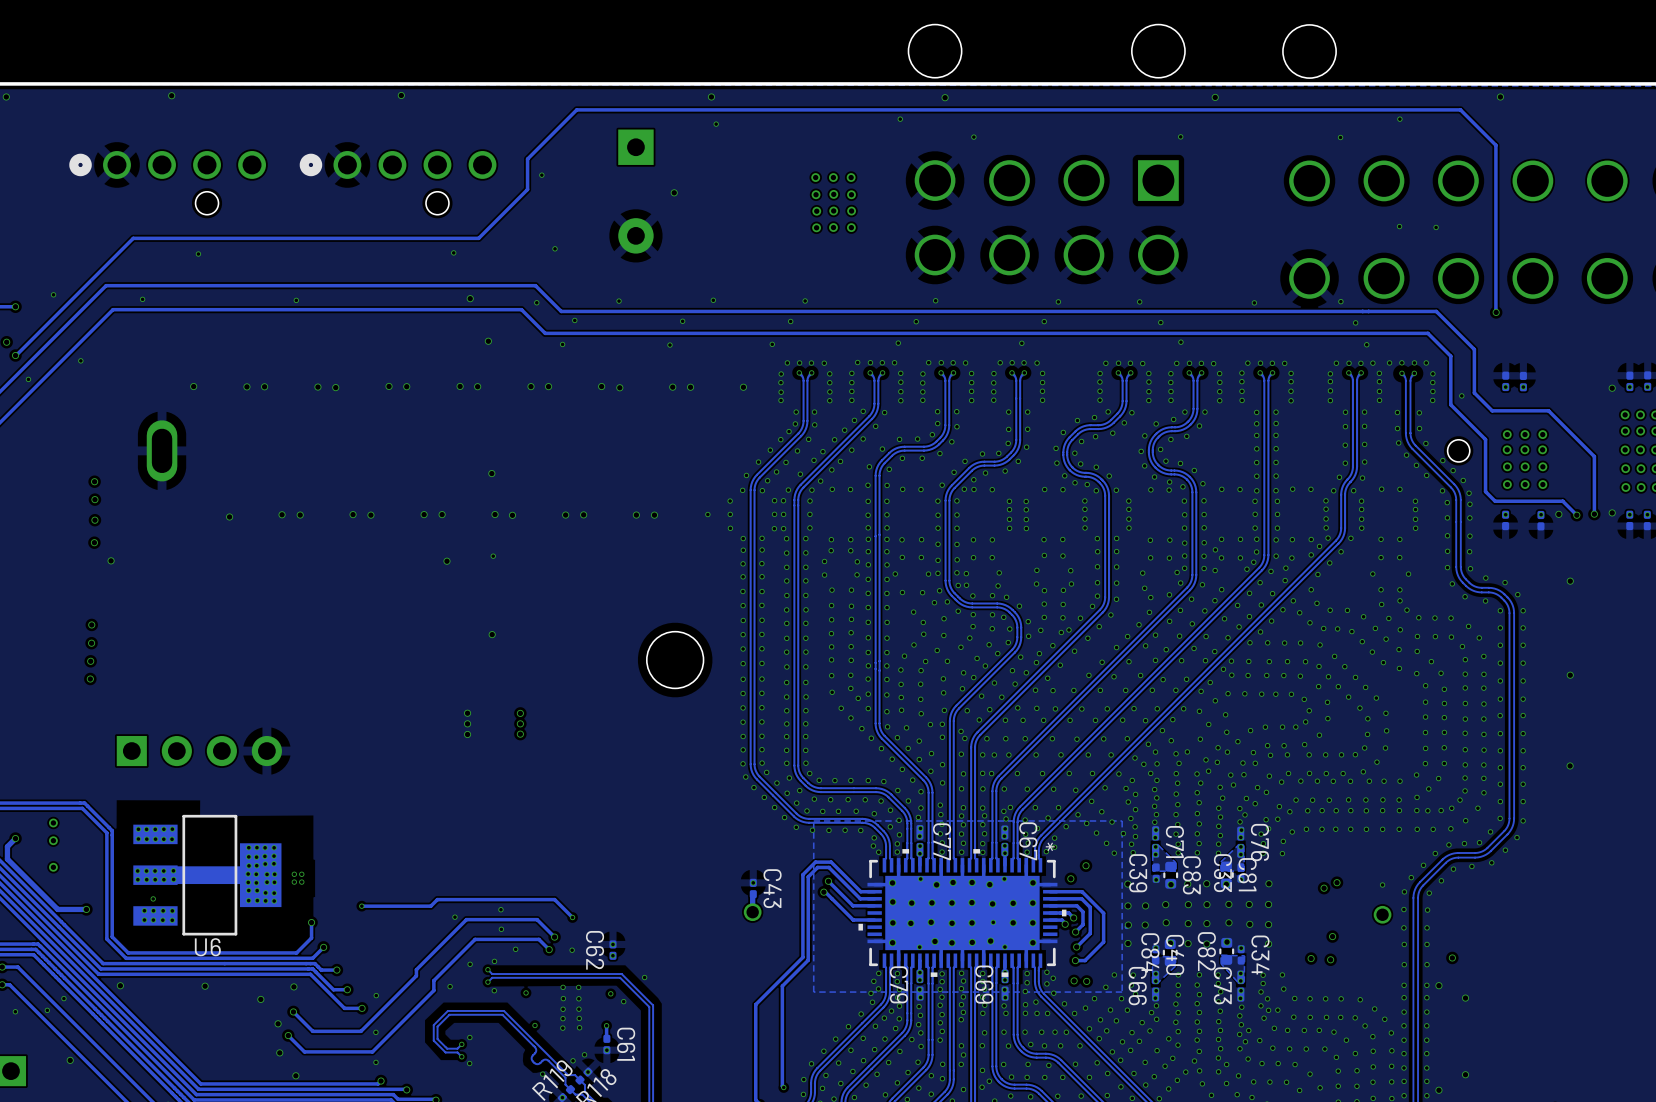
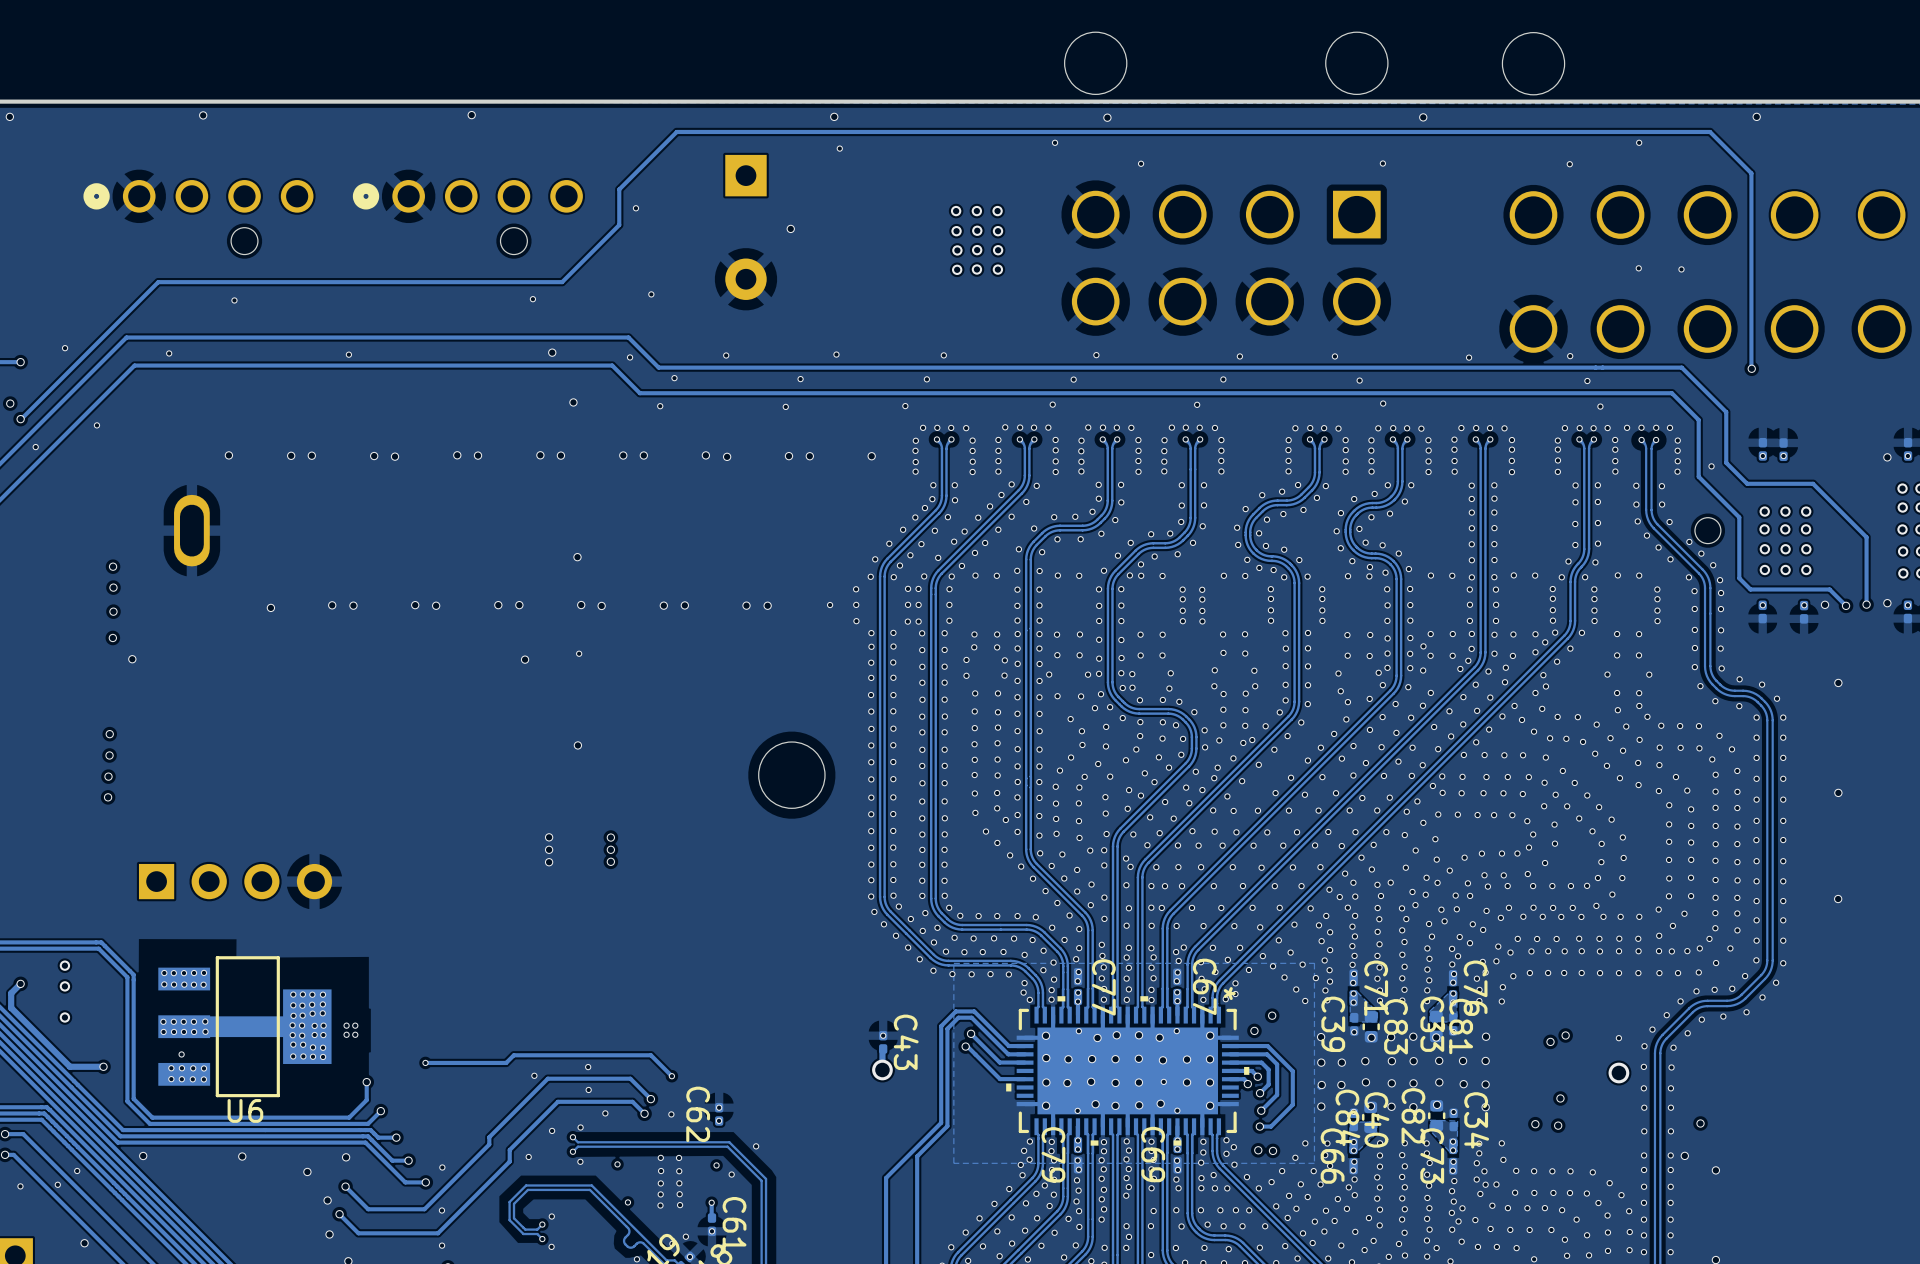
via: none -> (1545, 686)

